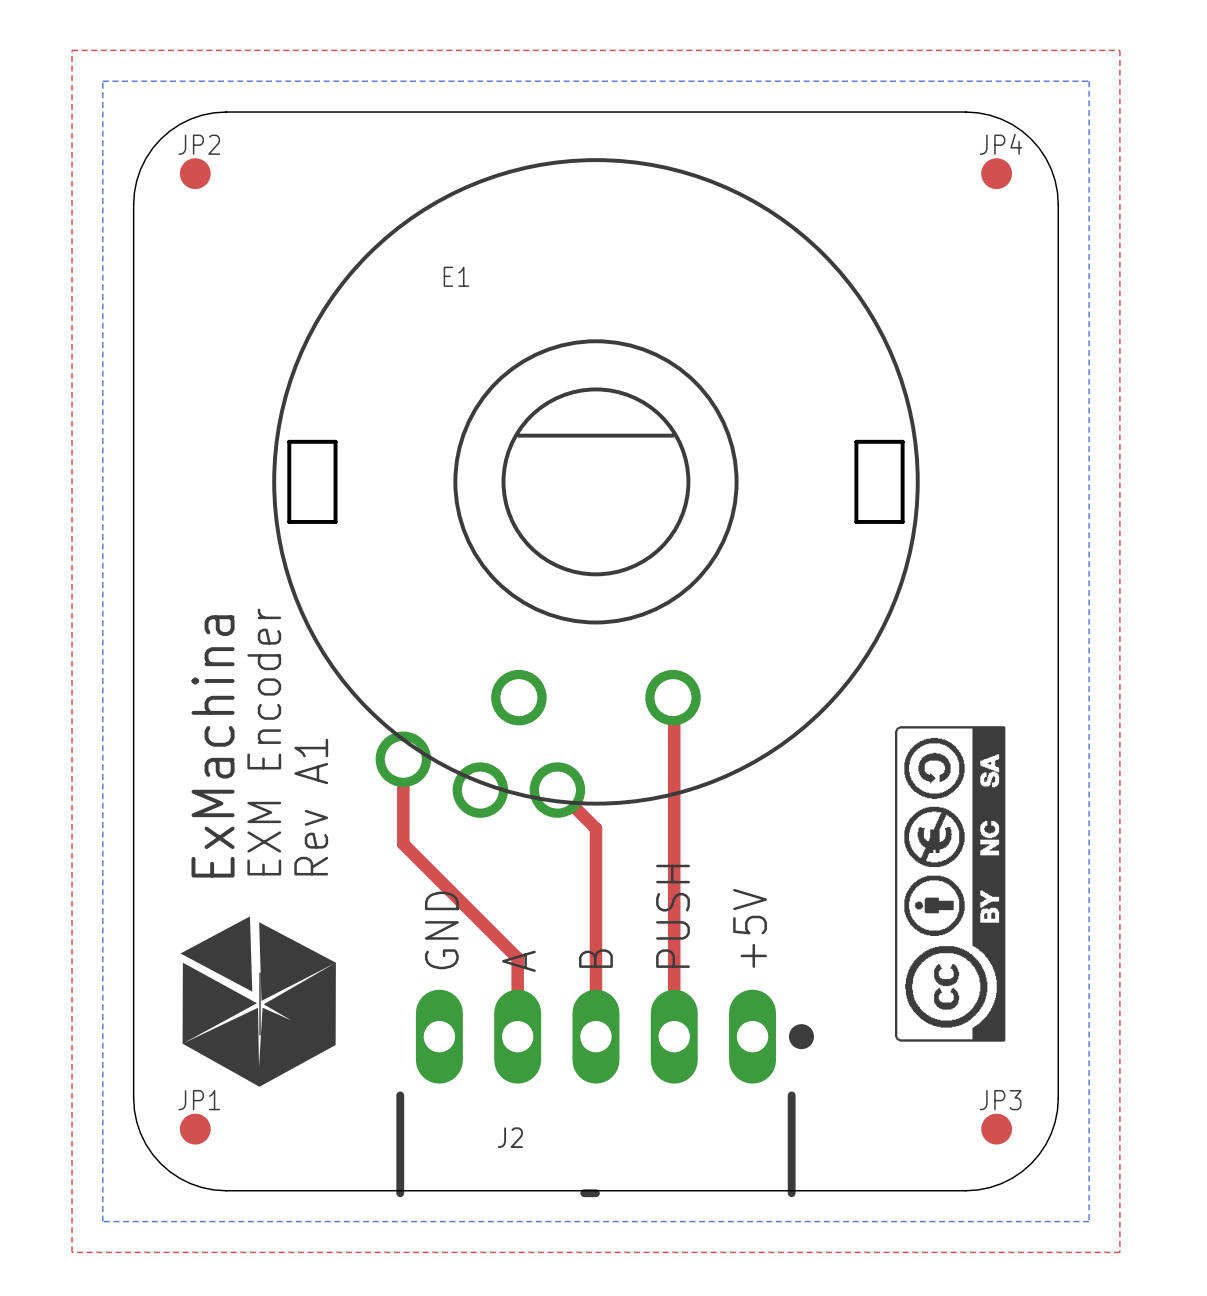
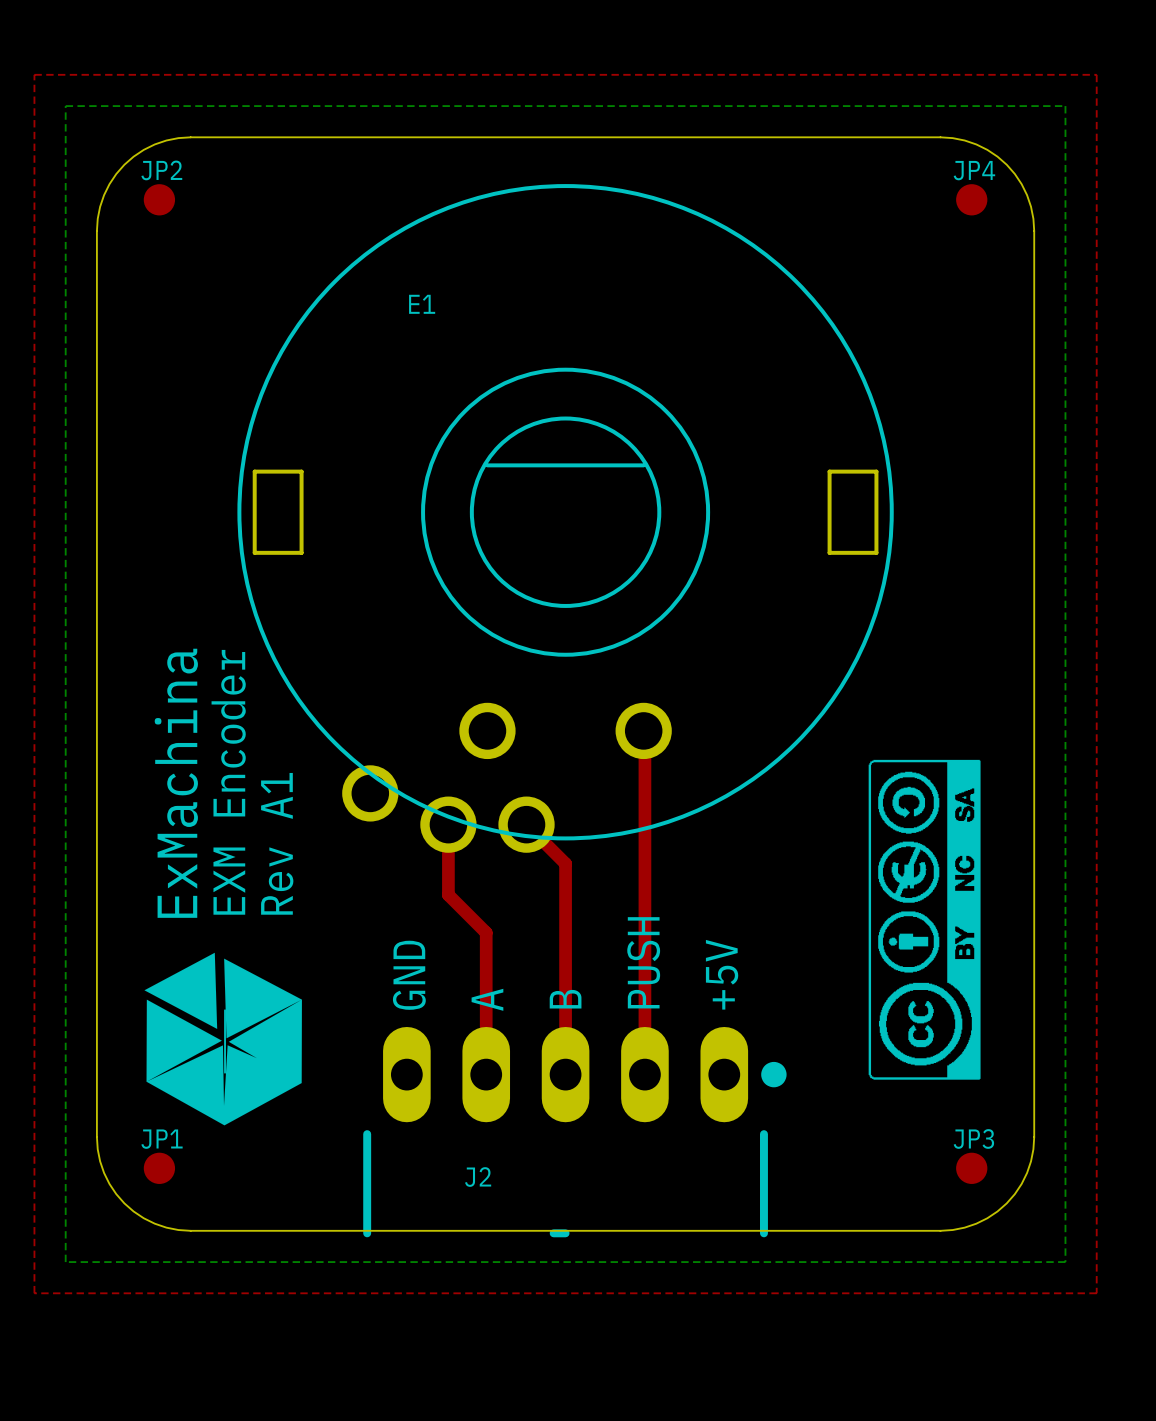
top track: (403, 759) (403, 844) (517, 958) -> (448, 824) (448, 894) (486, 932) (486, 995)

